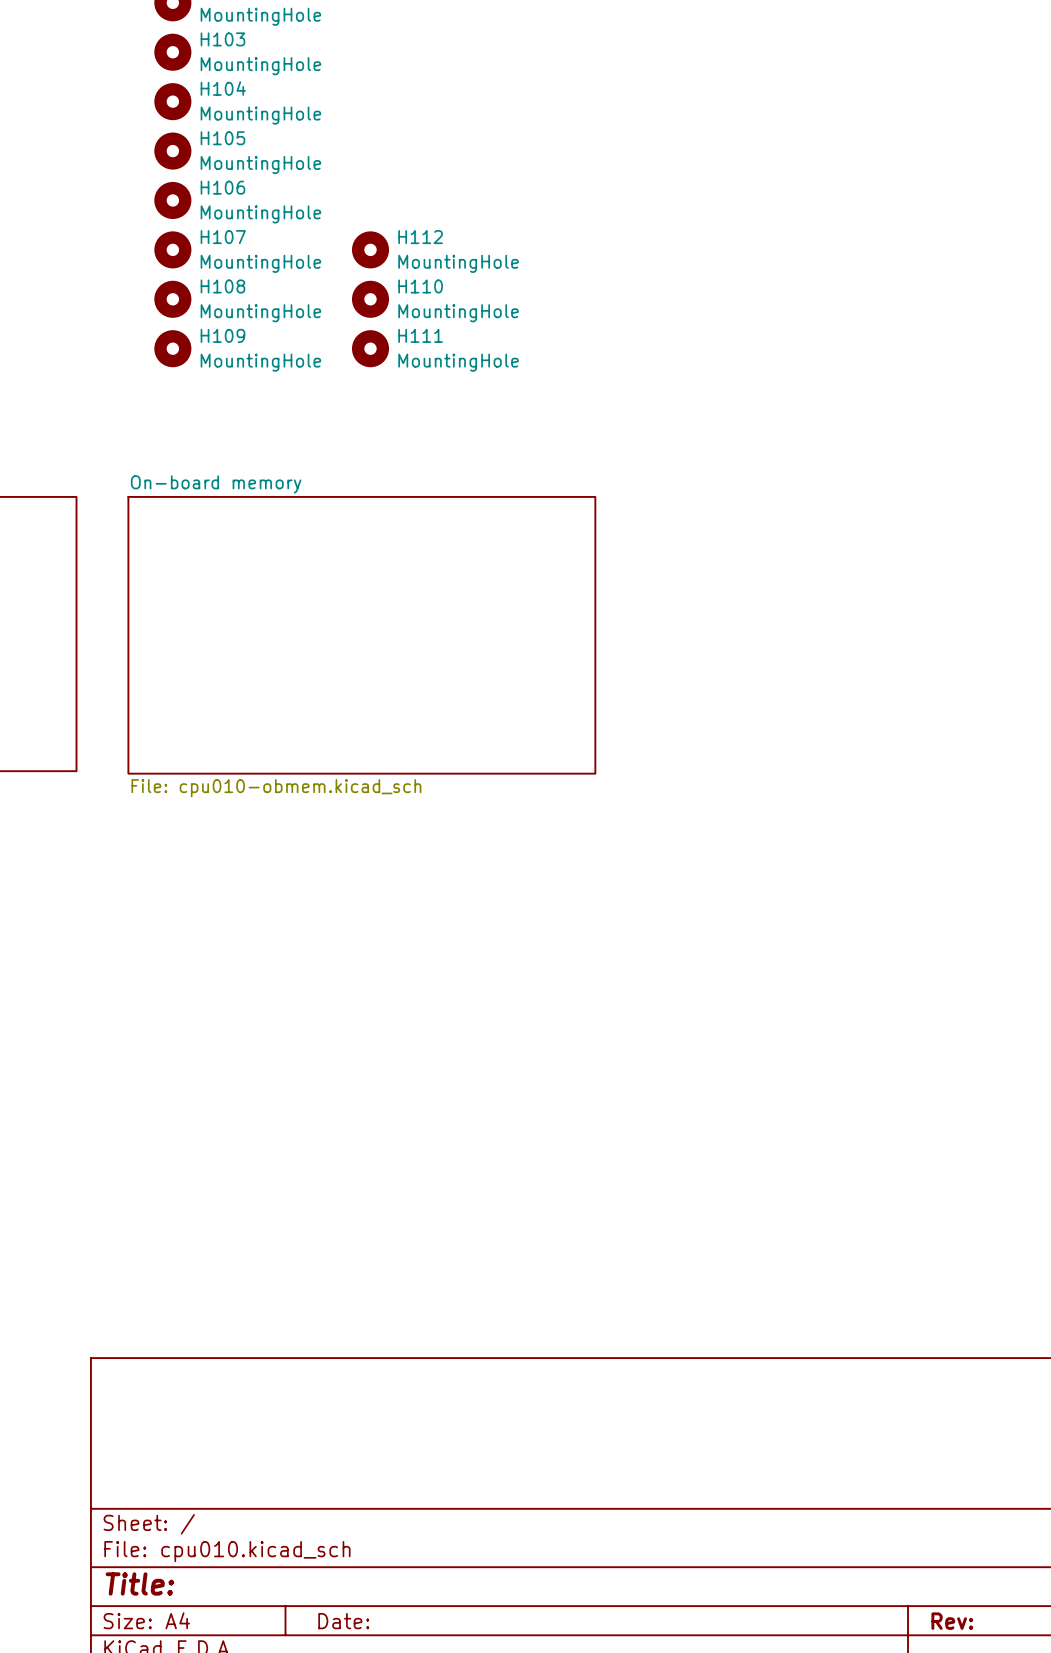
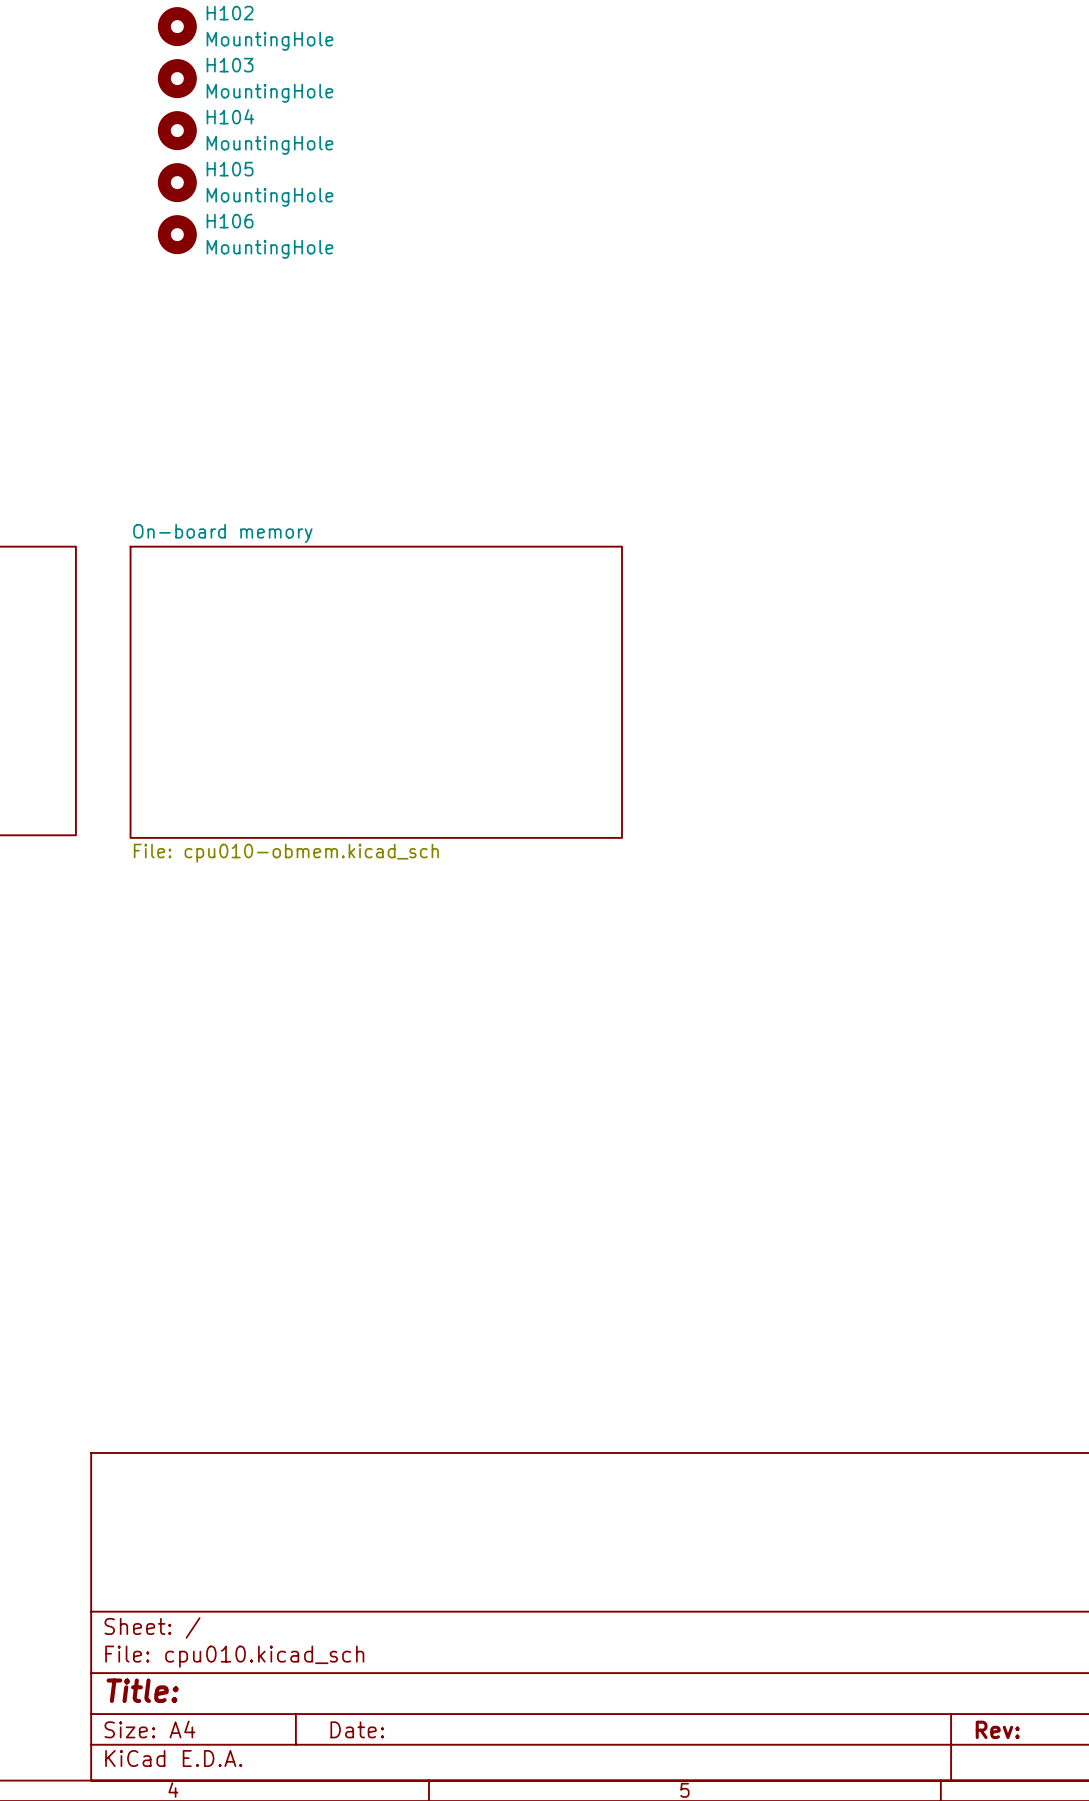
H107: MountingHole (172, 249) -> none
H112: MountingHole (370, 249) -> none
H108: MountingHole (172, 299) -> none
H110: MountingHole (370, 299) -> none
H109: MountingHole (172, 348) -> none
H111: MountingHole (370, 348) -> none

